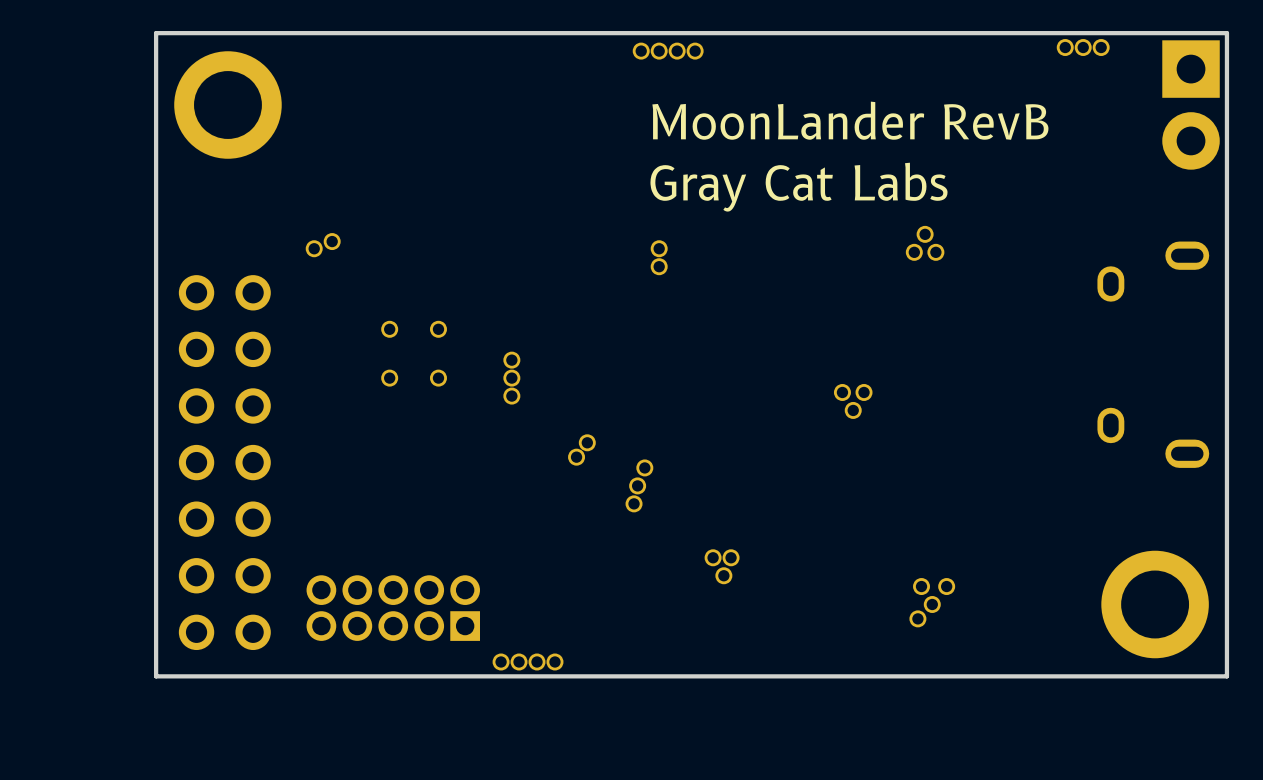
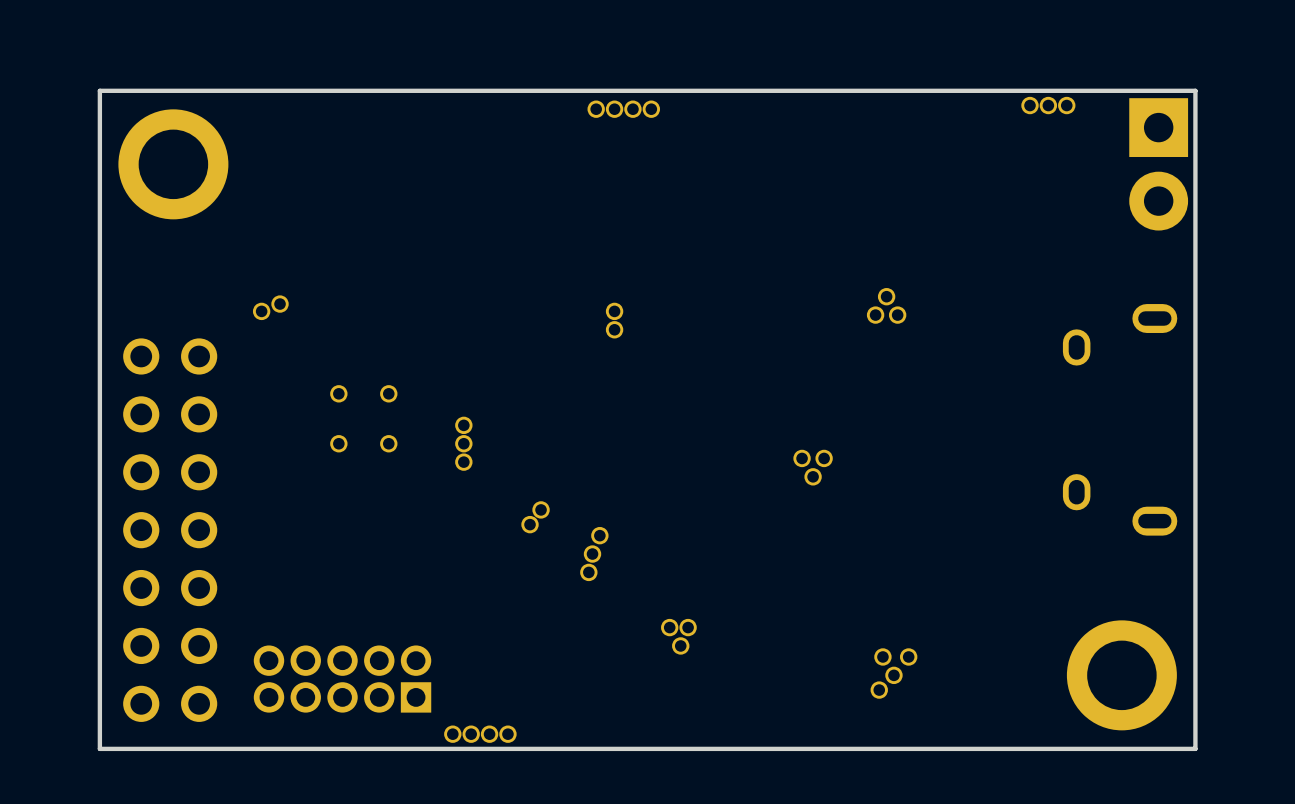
text: MoonLander RevB (850, 120) -> none
text: Gray Cat Labs (798, 187) -> none

